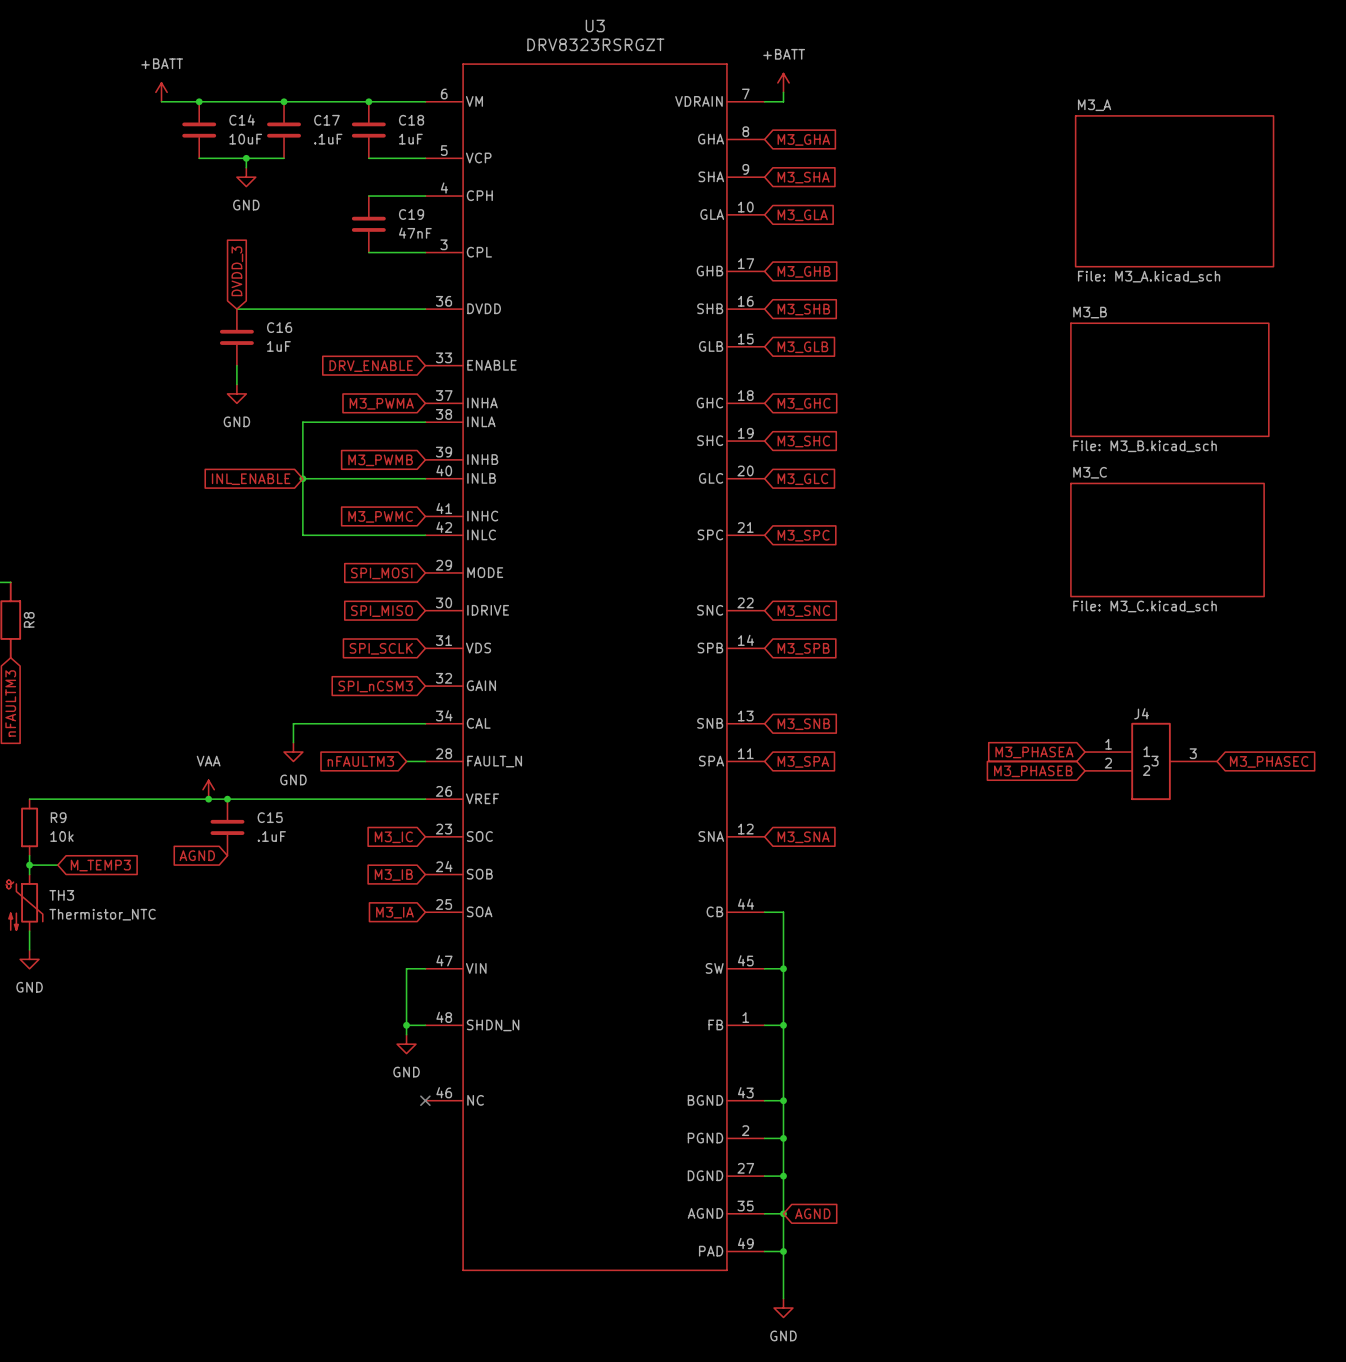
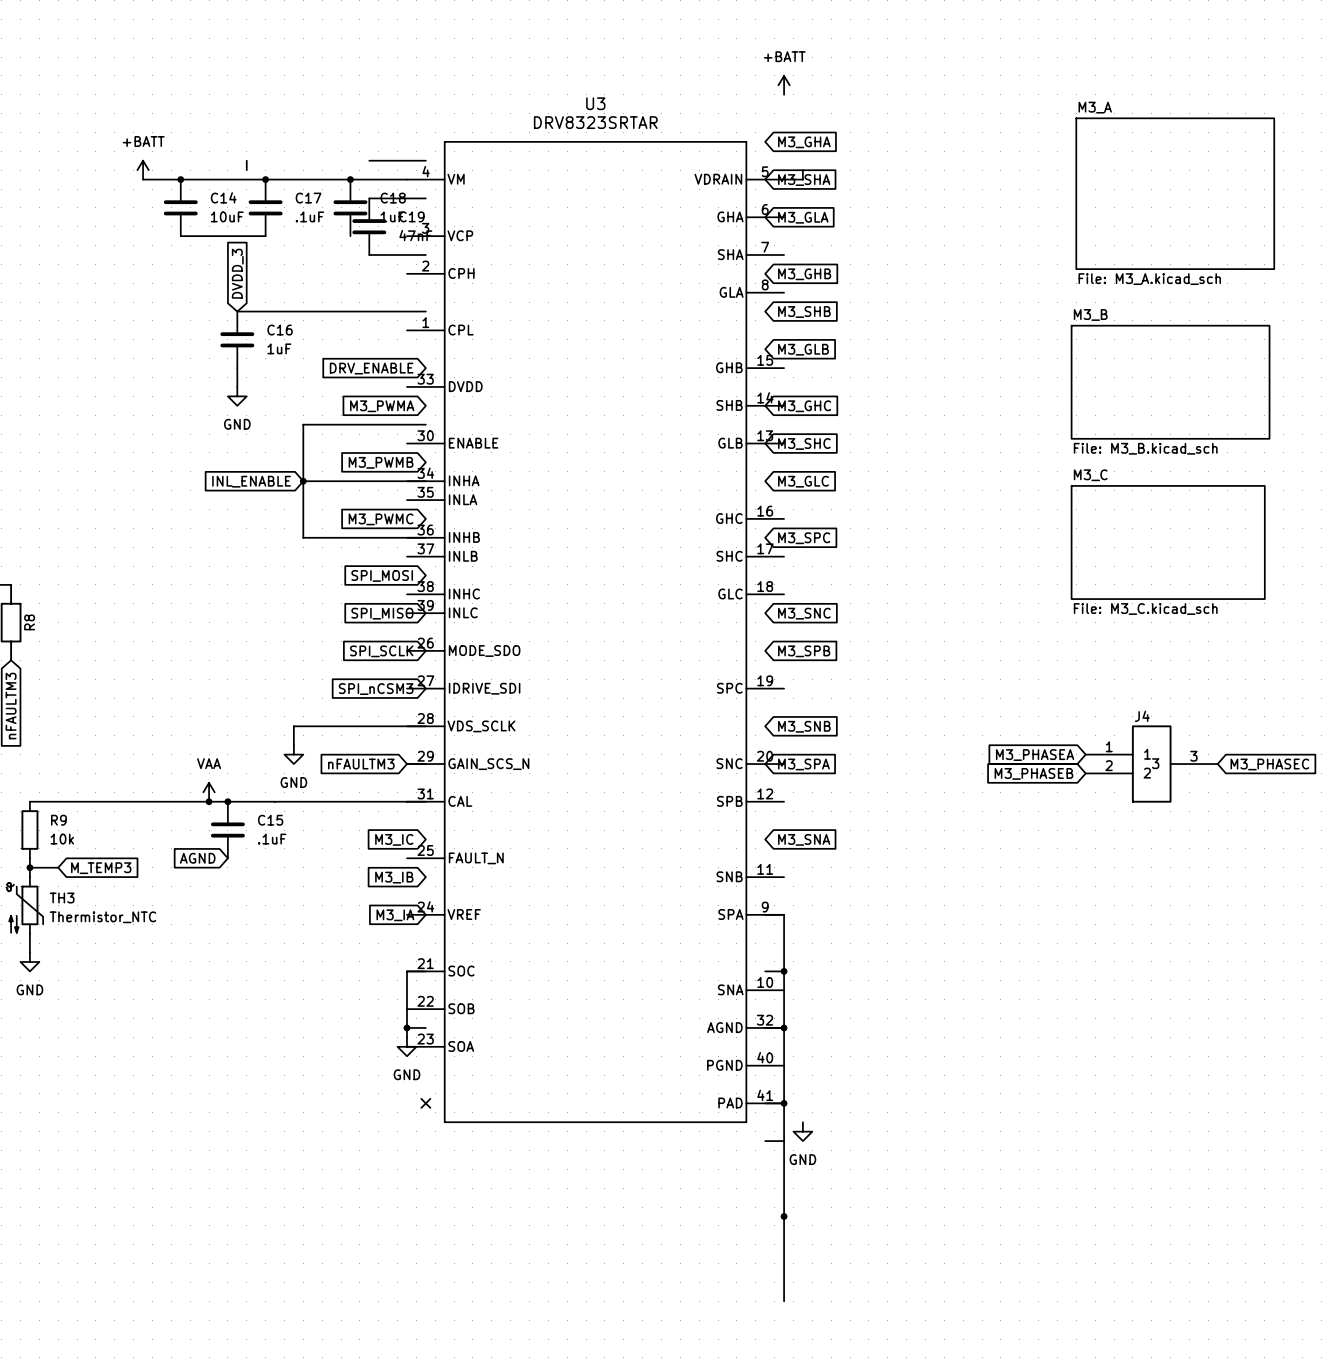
U3 name position: U3 (595, 25) -> U3 (595, 103)
U3 value: DRV8323RSRGZT (595, 44) -> DRV8323SRTAR (595, 122)
U3 symbol: [425, 63, 765, 1272] -> [407, 141, 785, 1123]
power symbol position: +BATT (161, 92) -> +BATT (143, 170)
wire: (783, 92) (783, 101) (764, 101) -> (802, 170) (802, 179) (784, 179)
wire: (161, 101) (425, 101) -> (143, 179) (407, 179)
junction: (199, 101) -> none
junction: (284, 101) -> none
junction: (368, 101) -> none
C14 position: (199, 130) -> (180, 207)
C17 position: (284, 130) -> (265, 207)
C18 position: (368, 130) -> (350, 207)
wire: (199, 158) (284, 158) -> (180, 236) (265, 236)
junction position: (246, 158) -> (265, 179)
junction: none -> (180, 179)
power symbol: GND (246, 177) -> none
junction: none -> (350, 179)
junction: (783, 1138) -> none
wire: (764, 1176) (783, 1176) -> none
junction: (783, 1176) -> none
wire: (764, 1213) (783, 1213) -> none
global label: AGND (812, 1213) -> none
wire: (764, 1251) (783, 1251) -> none
junction: (783, 1251) -> none
power symbol position: GND (783, 1308) -> GND (802, 1131)

